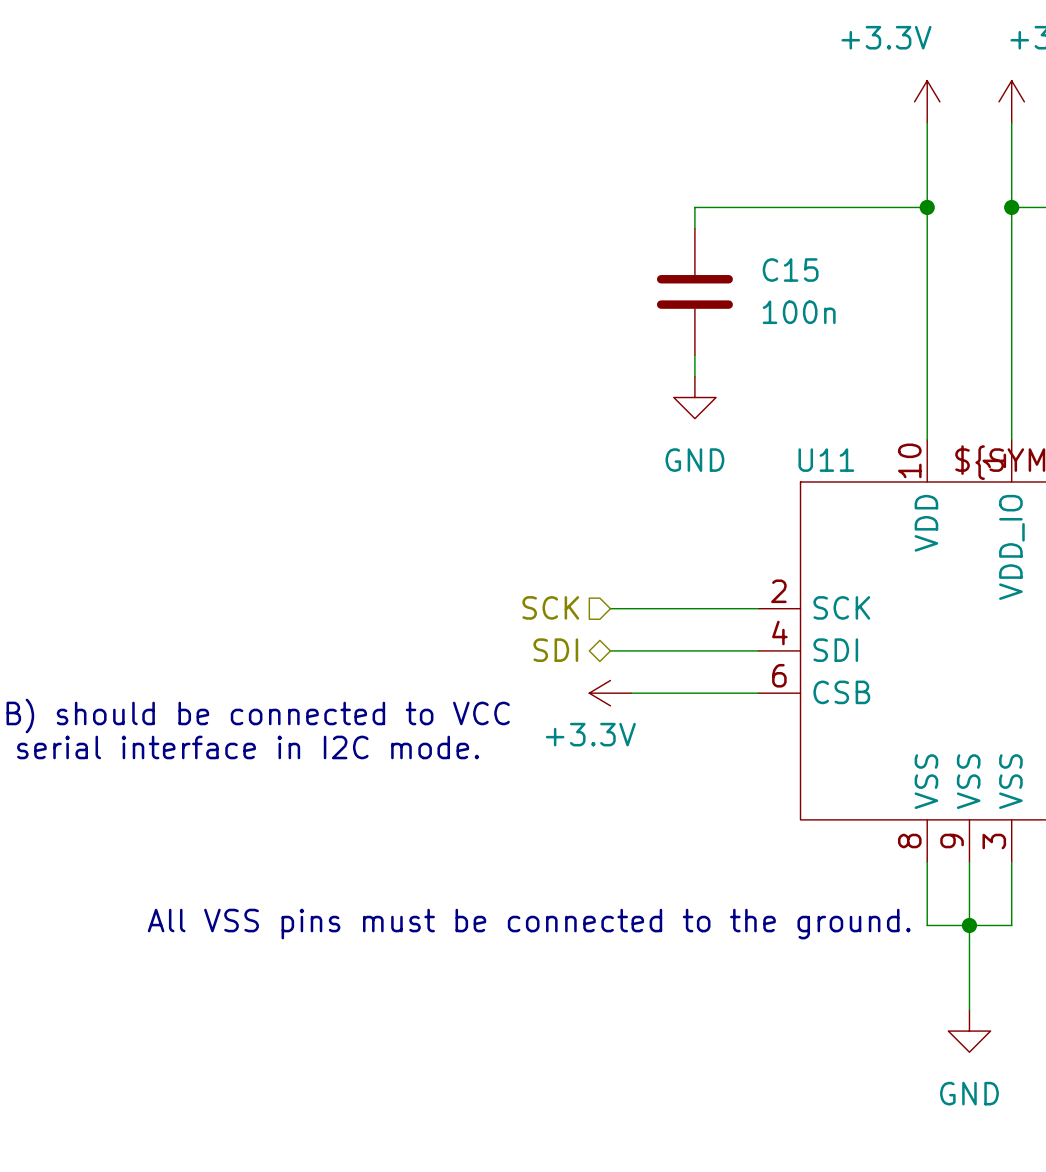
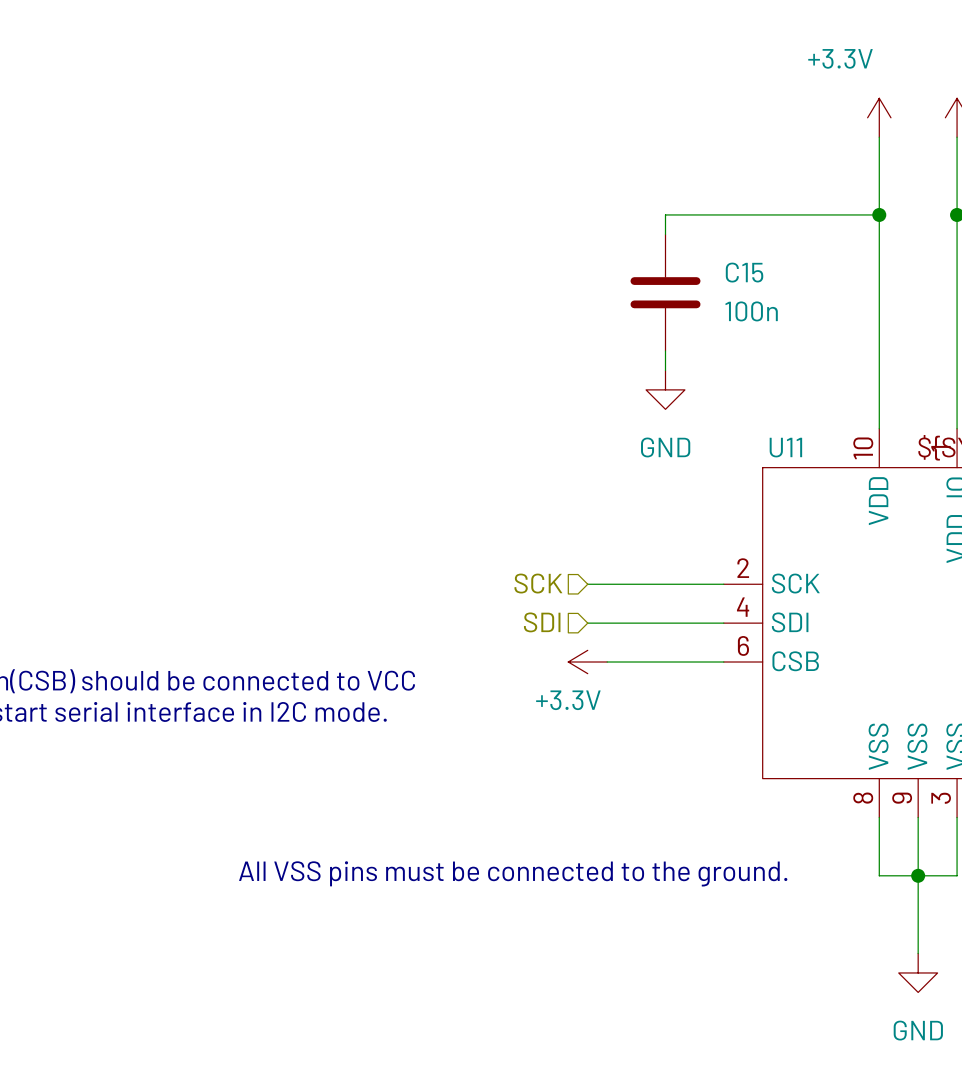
hierarchical label shape: bidirectional (555, 650) -> input (542, 622)

